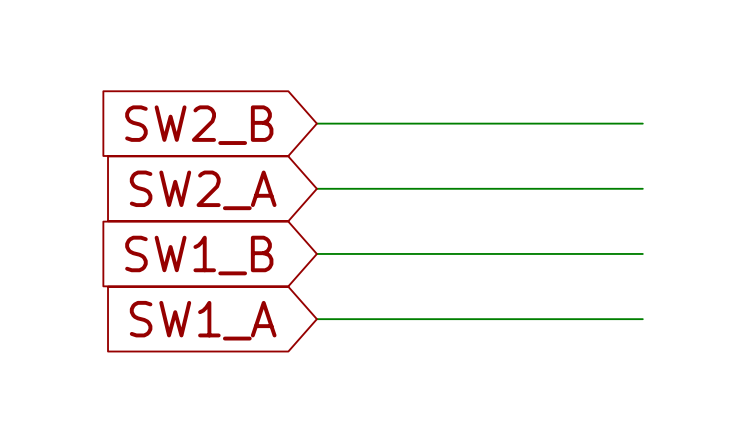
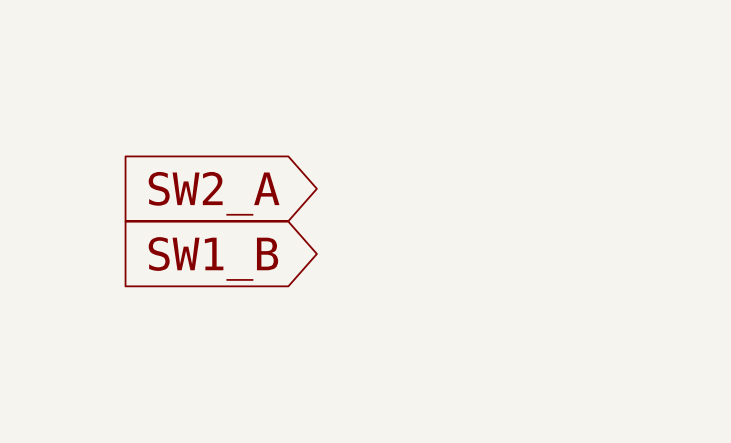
wire: (316, 123) (642, 123) -> none
global label: SW2_B (199, 125) -> none
wire: (316, 188) (642, 188) -> none
wire: (316, 253) (642, 253) -> none
wire: (316, 319) (642, 319) -> none
global label: SW1_A (203, 320) -> none

